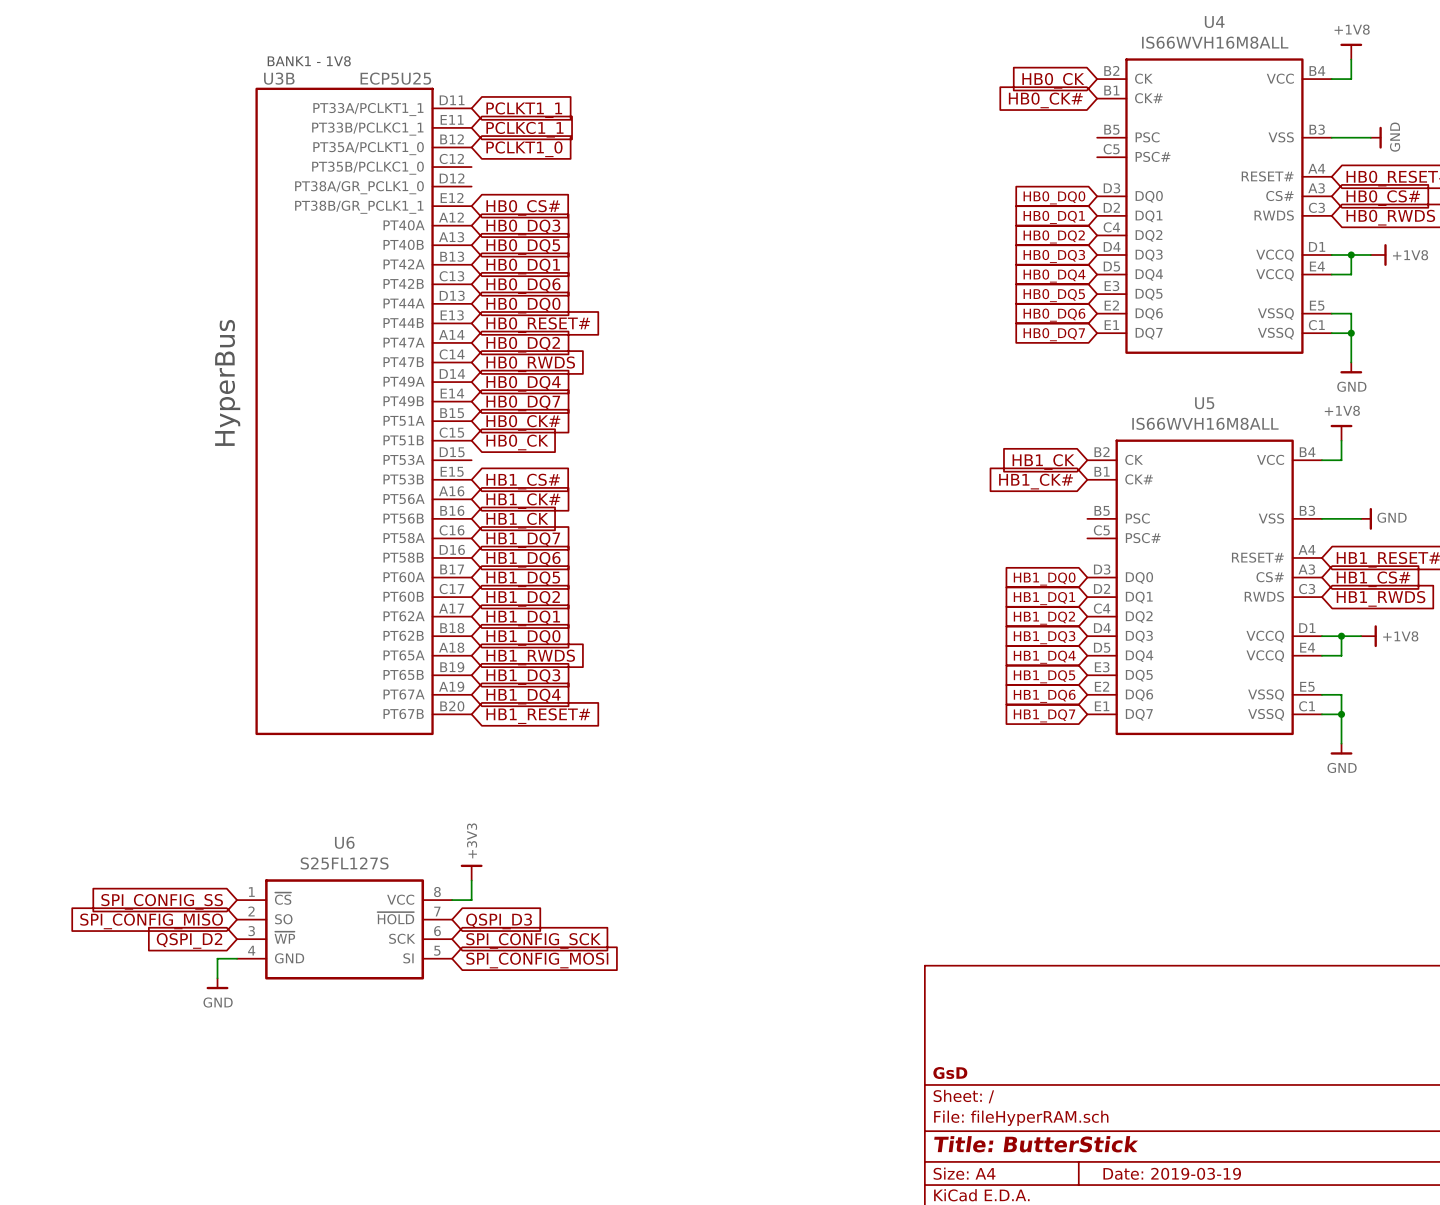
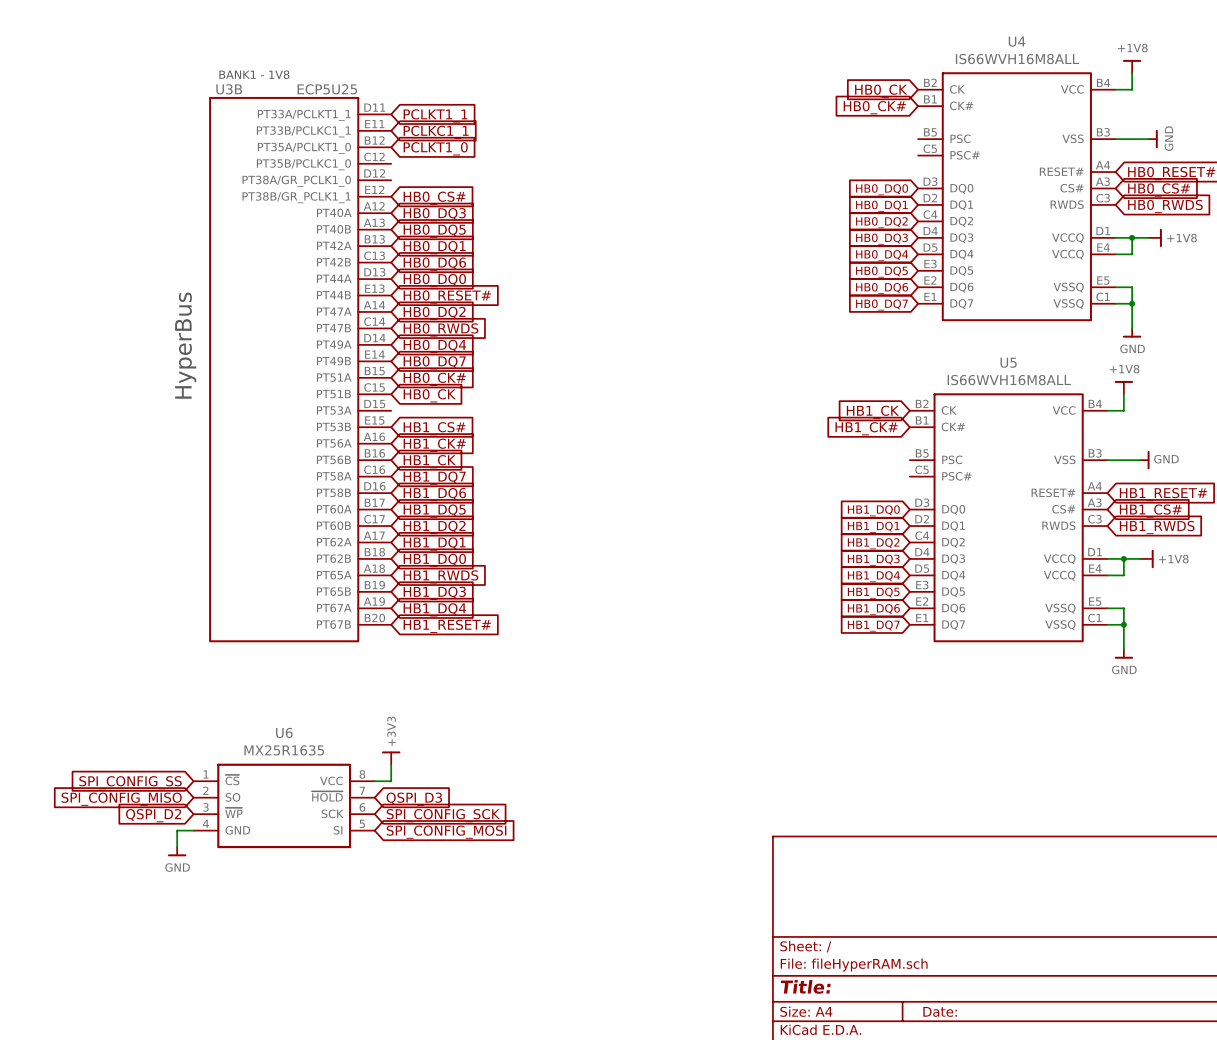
U6 value: S25FL127S (344, 863) -> MX25R1635 (284, 750)
title block: GsD (950, 1073) -> none
title block: Title: ButterStick (1036, 1144) -> Title: (805, 986)
title block: Date: 2019-03-19 (1172, 1173) -> Date: (940, 1011)

